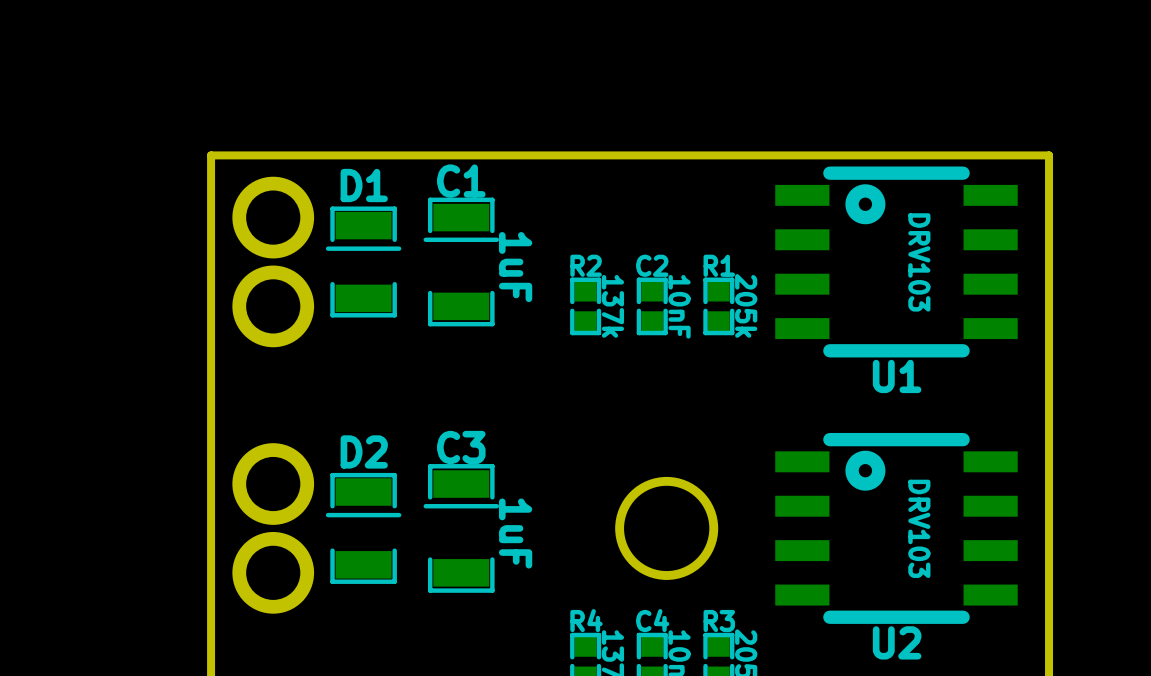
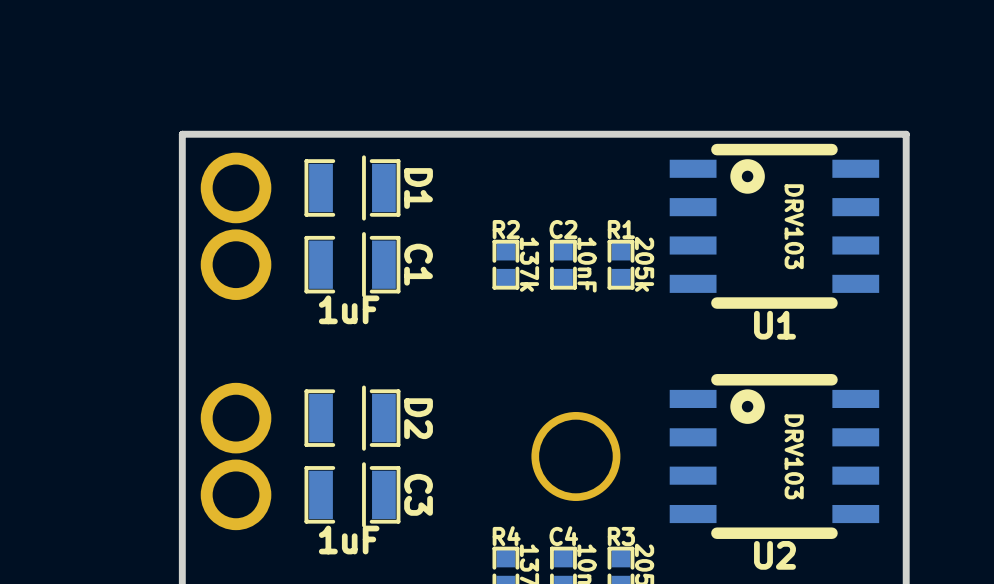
C1 name position: C1 (461, 181) -> C1 (418, 264)
C1 footprint: [423, 197, 500, 327] -> [304, 232, 401, 298]
D1 rotation: 0° (363, 261) -> 90° clockwise (352, 187)
C1 value position: 1uF (515, 267) -> 1uF (349, 309)
C3 name position: C3 (461, 447) -> C3 (418, 494)
C3 footprint: [423, 464, 500, 593] -> [304, 462, 401, 528]
D2 rotation: 0° (363, 528) -> 90° clockwise (352, 418)
C3 value position: 1uF (515, 533) -> 1uF (349, 540)

